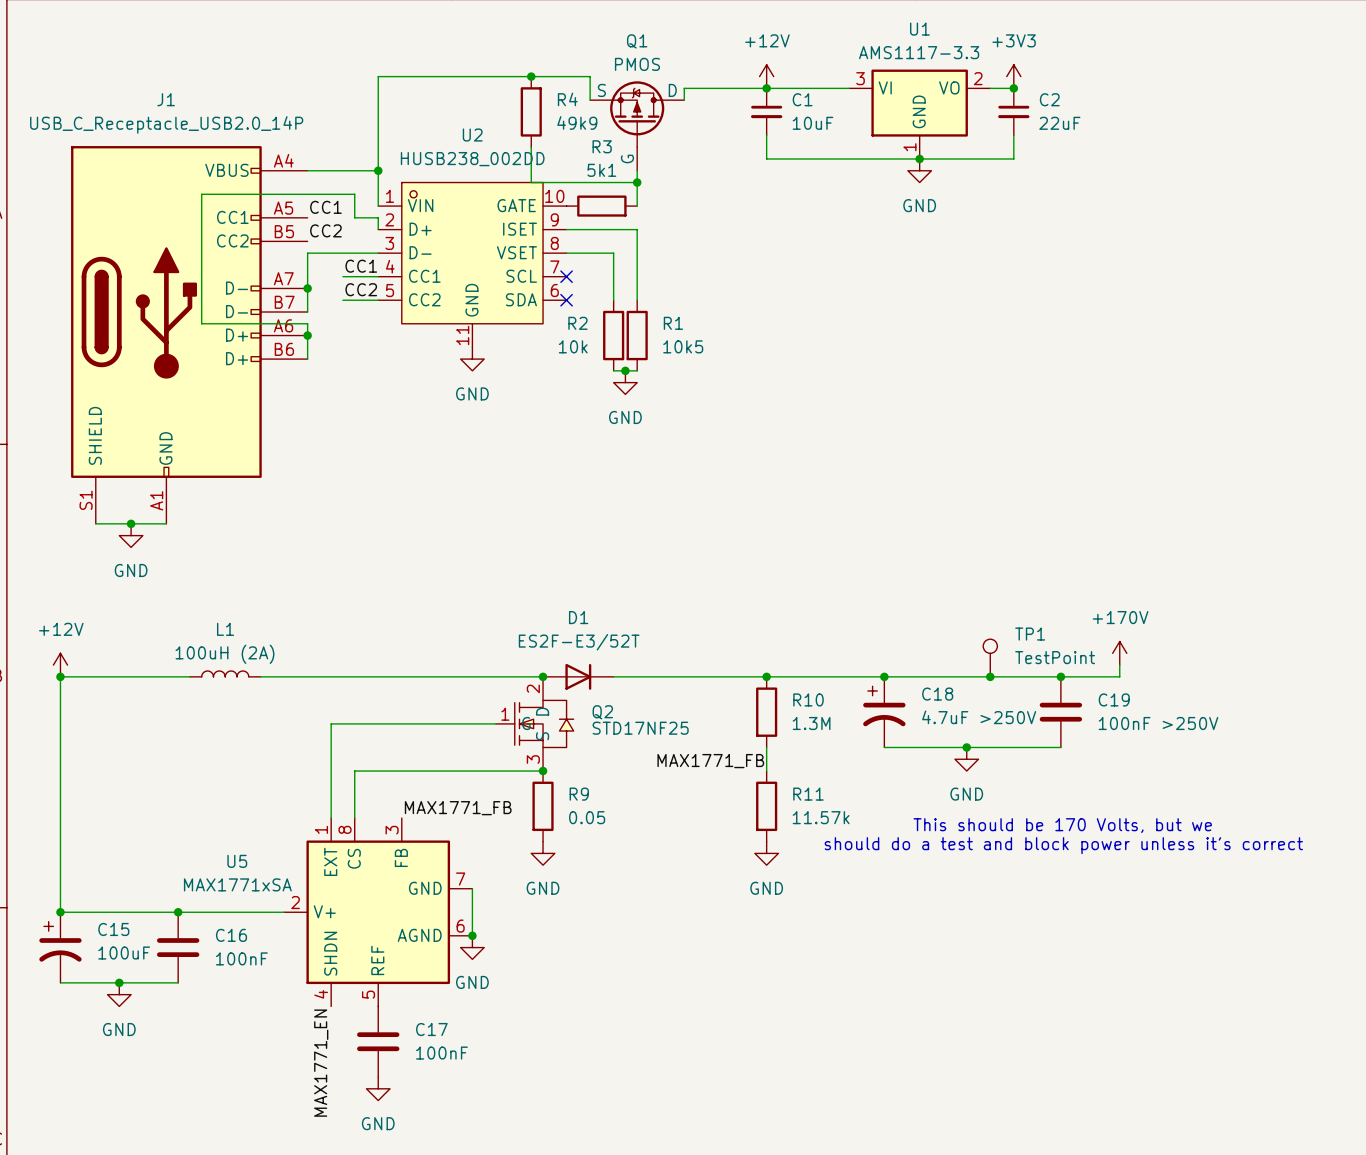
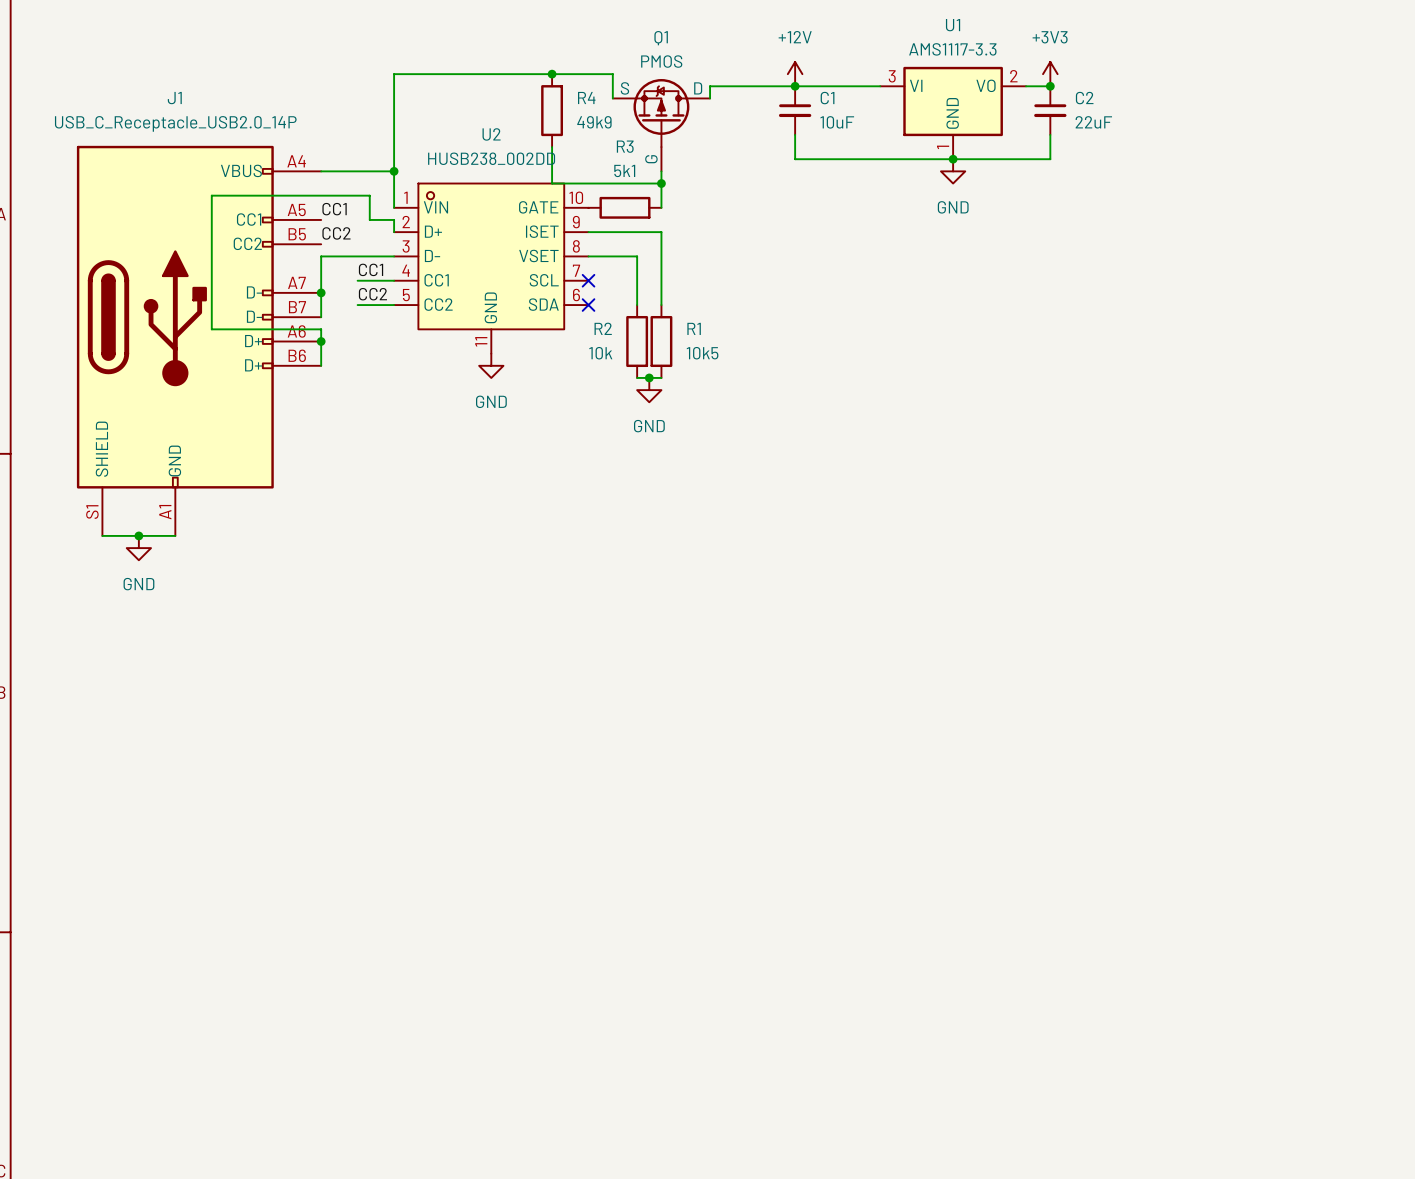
power symbol: +170V (1119, 653) -> none
TP1: TestPoint (990, 658) -> none
power symbol: +12V (60, 665) -> none
wire: (1119, 665) (1119, 676) (613, 676) -> none
L1: 100uH (2A) (225, 673) -> none
junction: (60, 676) -> none
wire: (189, 676) (60, 676) (60, 912) (284, 912) -> none
wire: (260, 676) (543, 676) -> none
junction: (543, 676) -> none
D1: ES2F-E3/52T (578, 676) -> none
junction: (766, 676) -> none
junction: (884, 676) -> none
junction: (990, 676) -> none
junction: (1060, 676) -> none
R10: 1.3M (766, 712) -> none
C18: 4.7uF >250V (884, 712) -> none
C19: 100nF >250V (1060, 712) -> none
wire: (495, 723) (331, 723) (331, 818) -> none
Q2: STD17NF25 (534, 723) -> none
wire: (766, 747) (766, 771) -> none
wire: (884, 747) (1060, 747) -> none
junction: (966, 747) -> none
power symbol: GND (966, 759) -> none
label: MAX1771_FB (710, 761) -> none
wire: (543, 771) (354, 771) (354, 818) -> none
junction: (543, 771) -> none
R9: 0.05 (543, 806) -> none
R11: 11.57k (766, 806) -> none
label: MAX1771_FB (458, 808) -> none
text: This should be 170 Volts, but we (1062, 825) -> none
text: should do a test and block power unless it's correct (1063, 845) -> none
power symbol: GND (543, 853) -> none
power symbol: GND (766, 853) -> none
wire: (472, 888) (472, 935) -> none
junction: (60, 912) -> none
junction: (178, 912) -> none
U5: MAX1771xSA (378, 912) -> none
junction: (472, 935) -> none
C15: 100uF (60, 947) -> none
C16: 100nF (178, 947) -> none
power symbol: GND (472, 947) -> none
wire: (60, 982) (178, 982) -> none
junction: (119, 982) -> none
power symbol: GND (119, 994) -> none
C17: 100nF (378, 1041) -> none
label: MAX1771_EN (321, 1063) -> none
power symbol: GND (378, 1088) -> none

